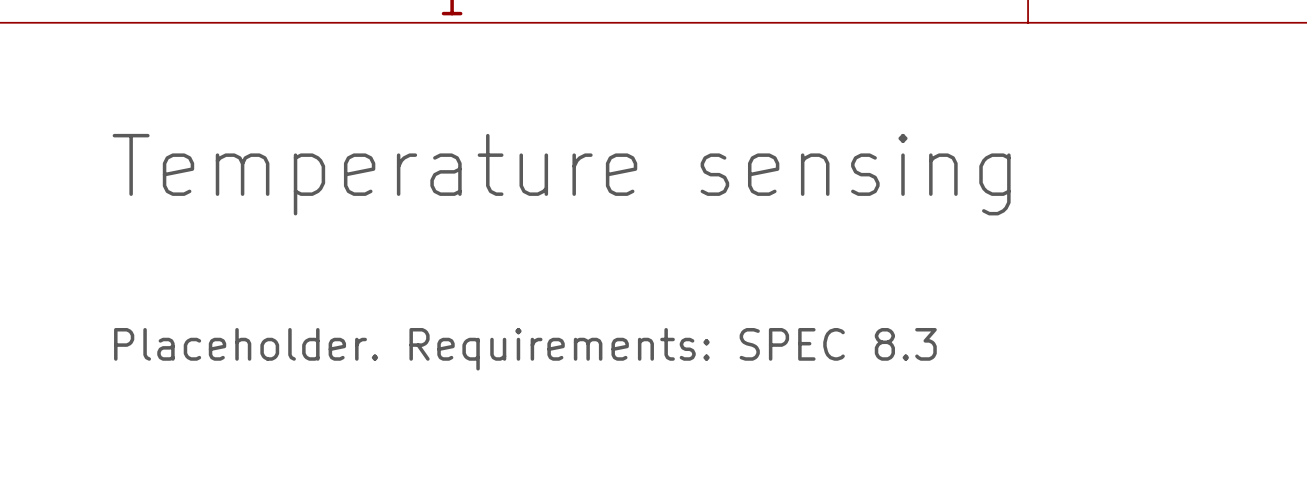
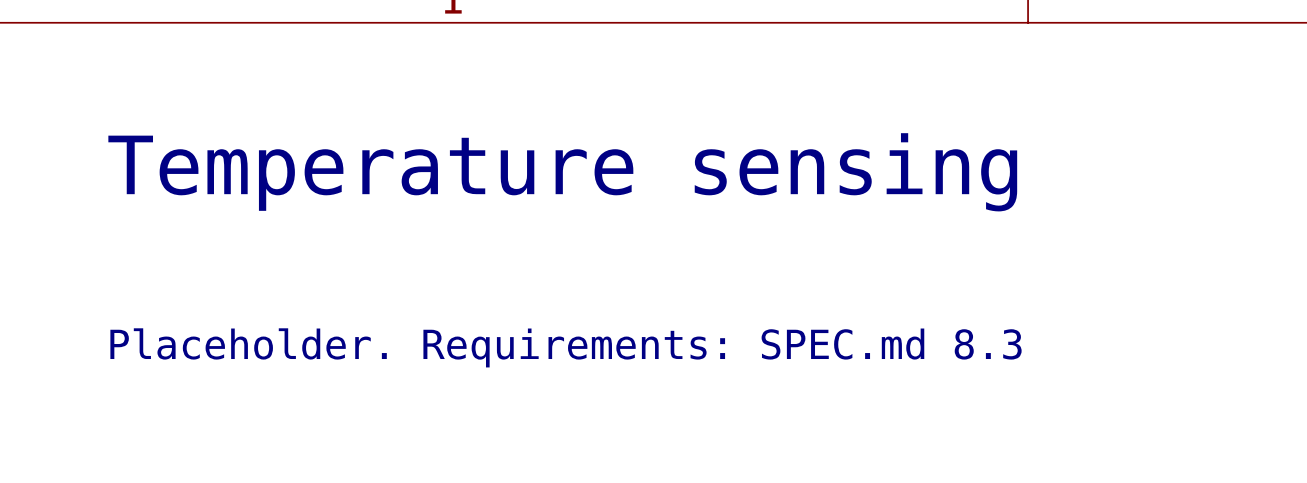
text: Placeholder. Requirements: SPEC 8.3 (525, 349) -> Placeholder. Requirements: SPEC.md 8.3 (566, 347)

